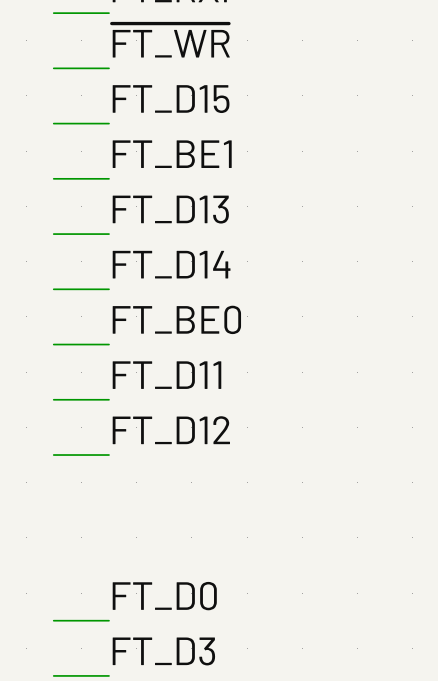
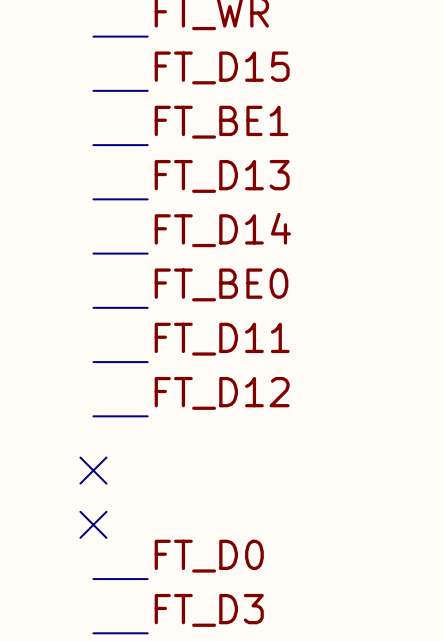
no-connect mark: none -> (93, 470)
no-connect mark: none -> (93, 524)

